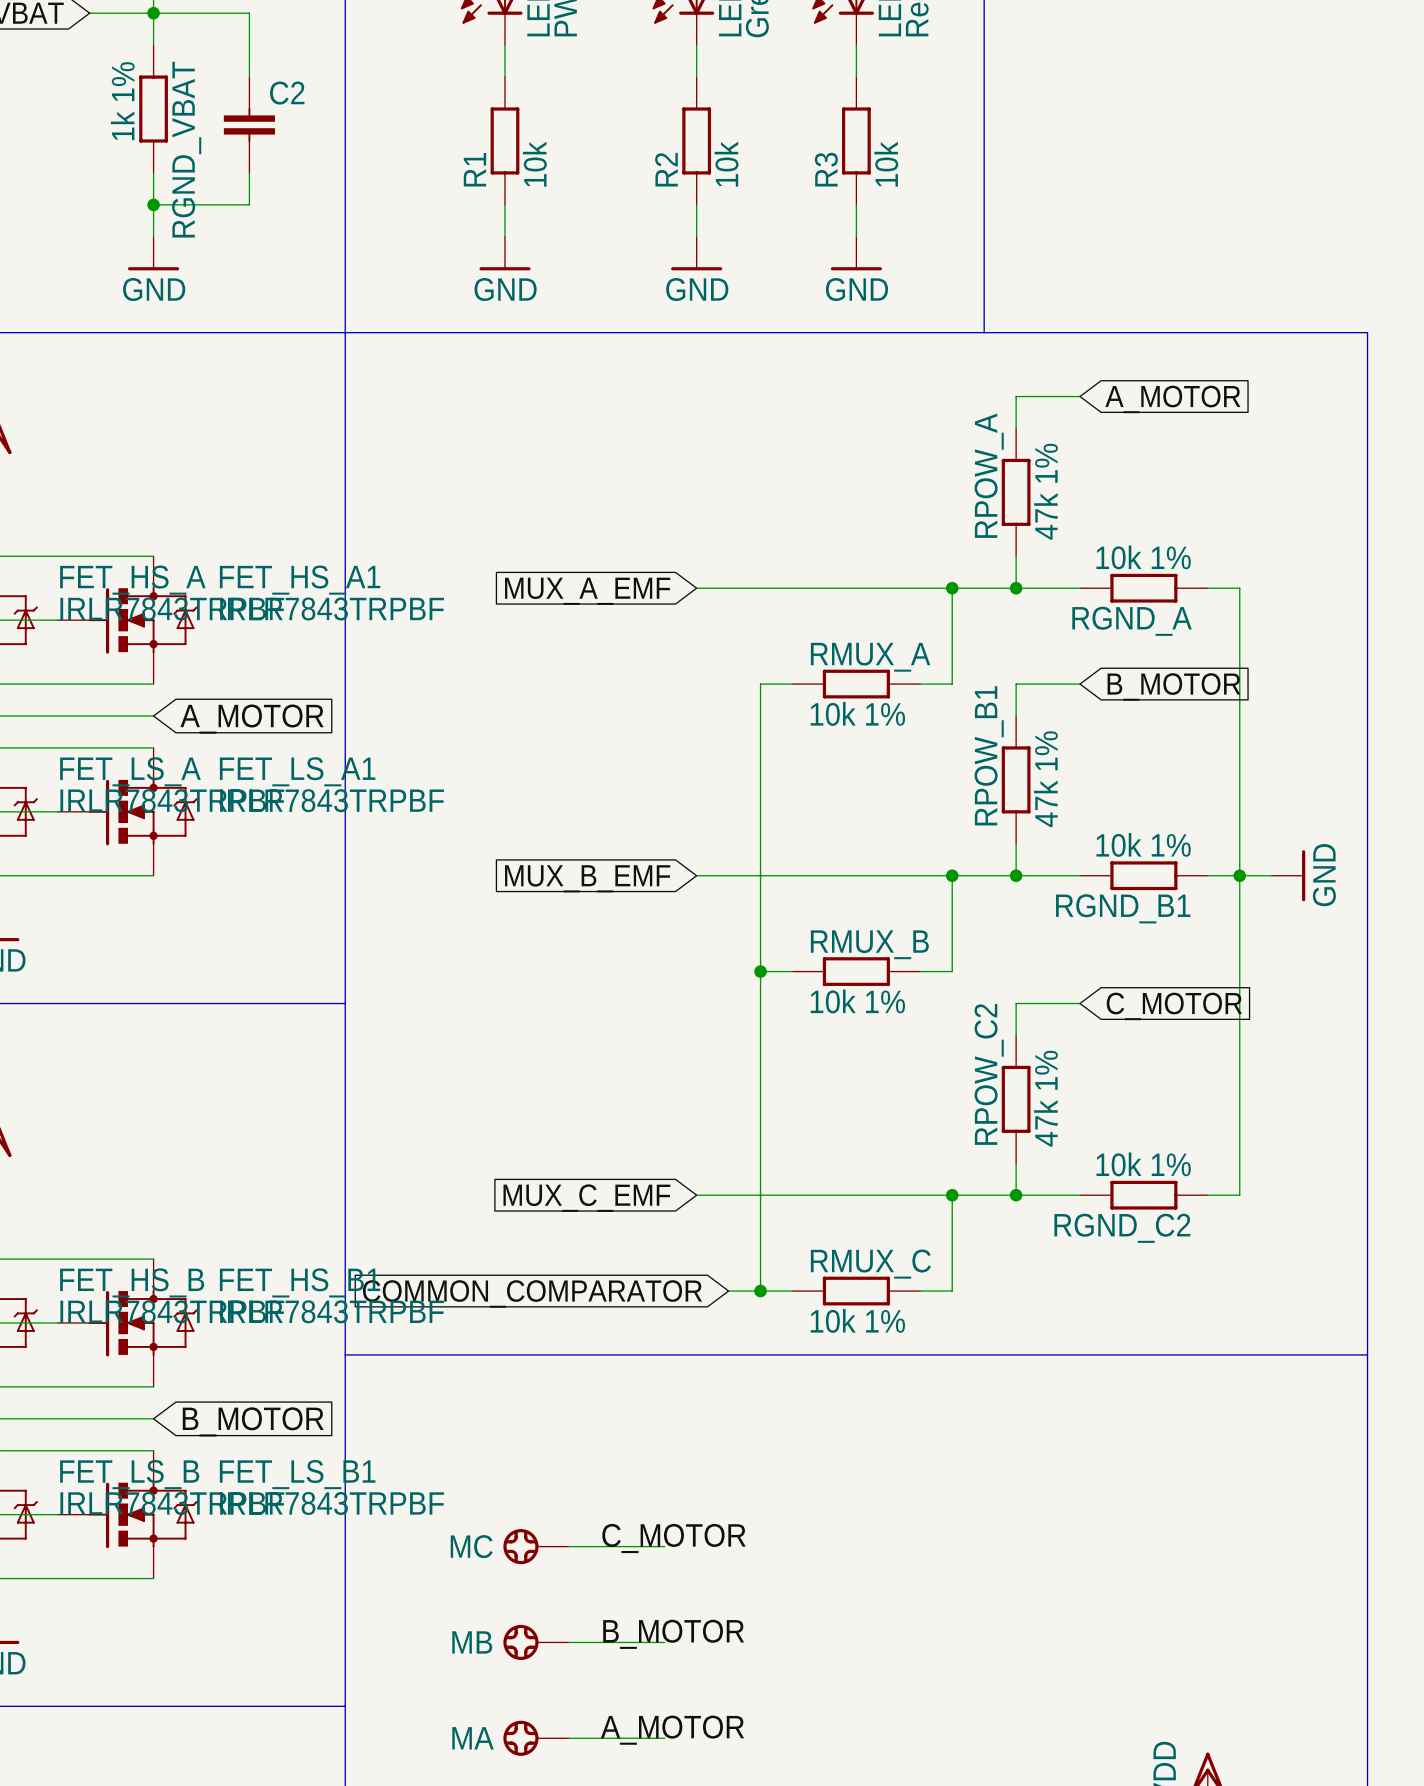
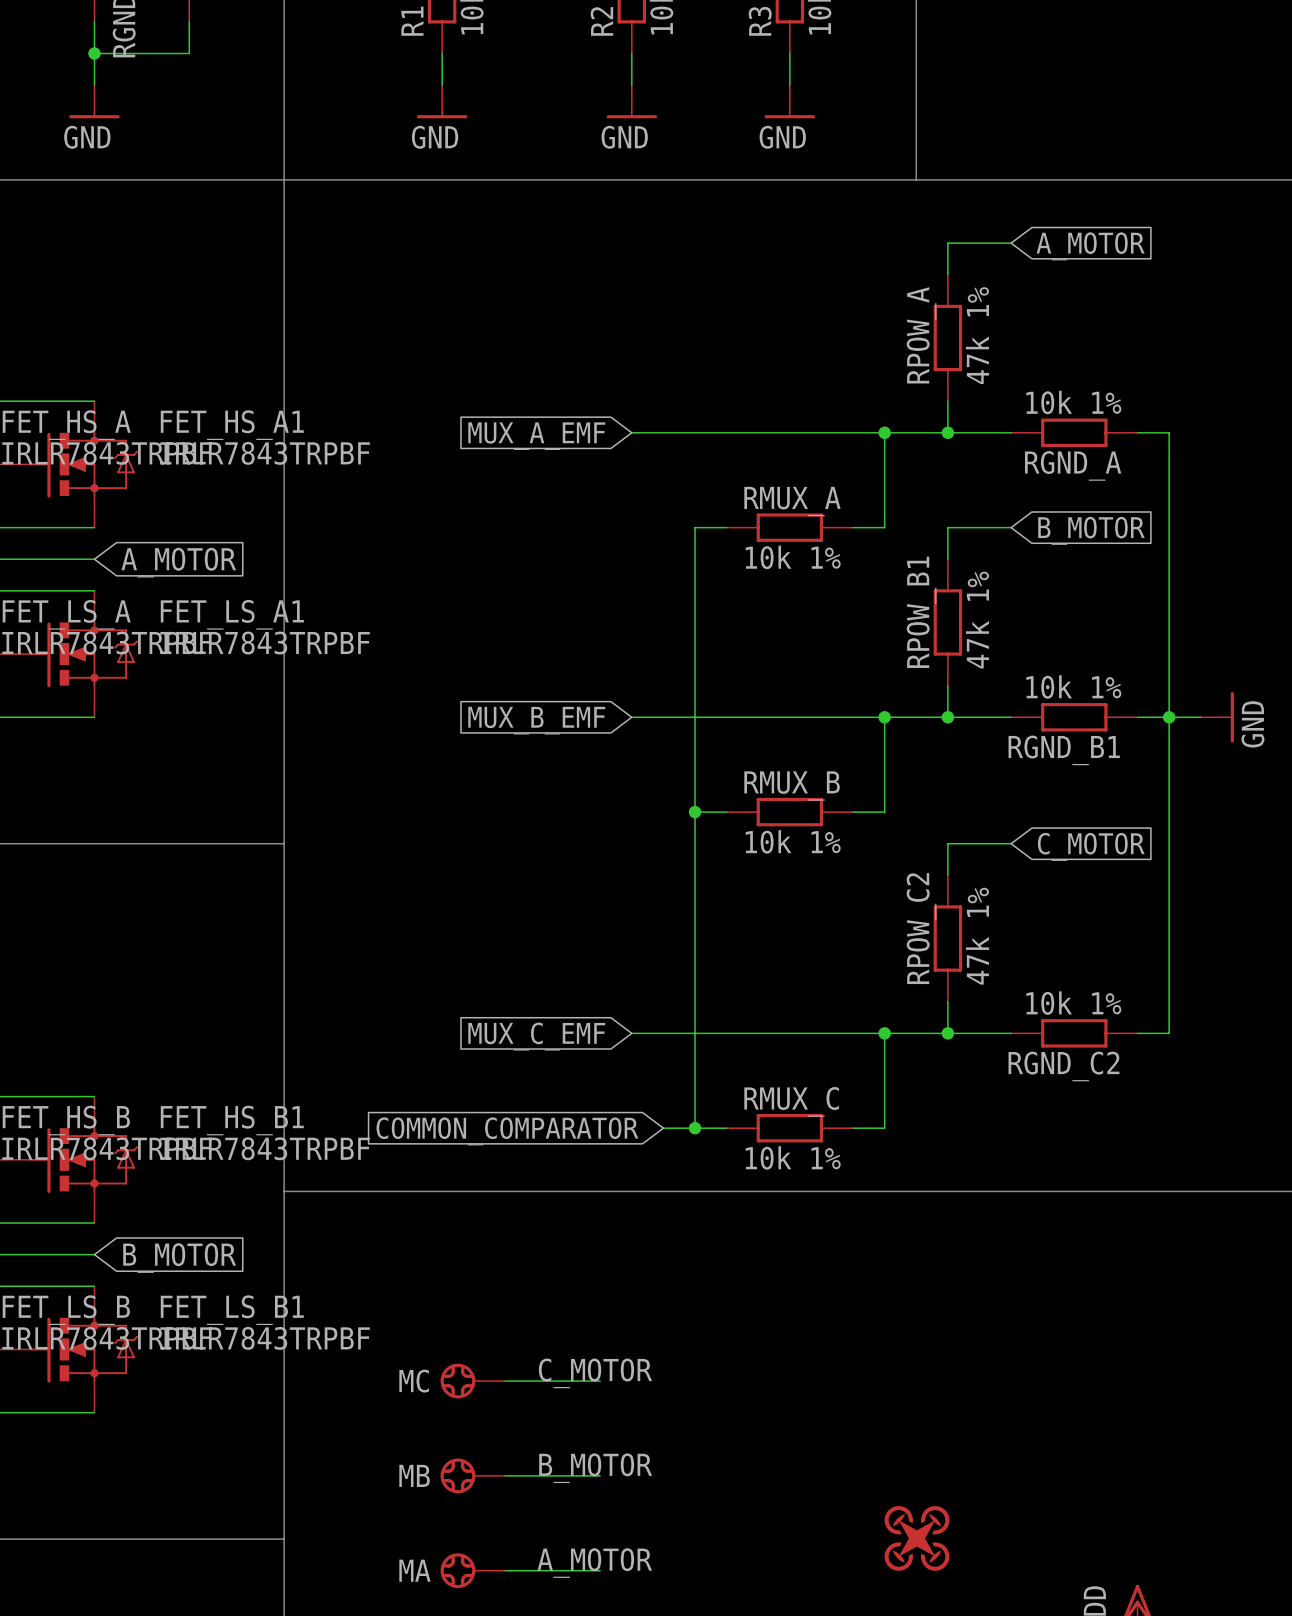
part: none -> (916, 1538)

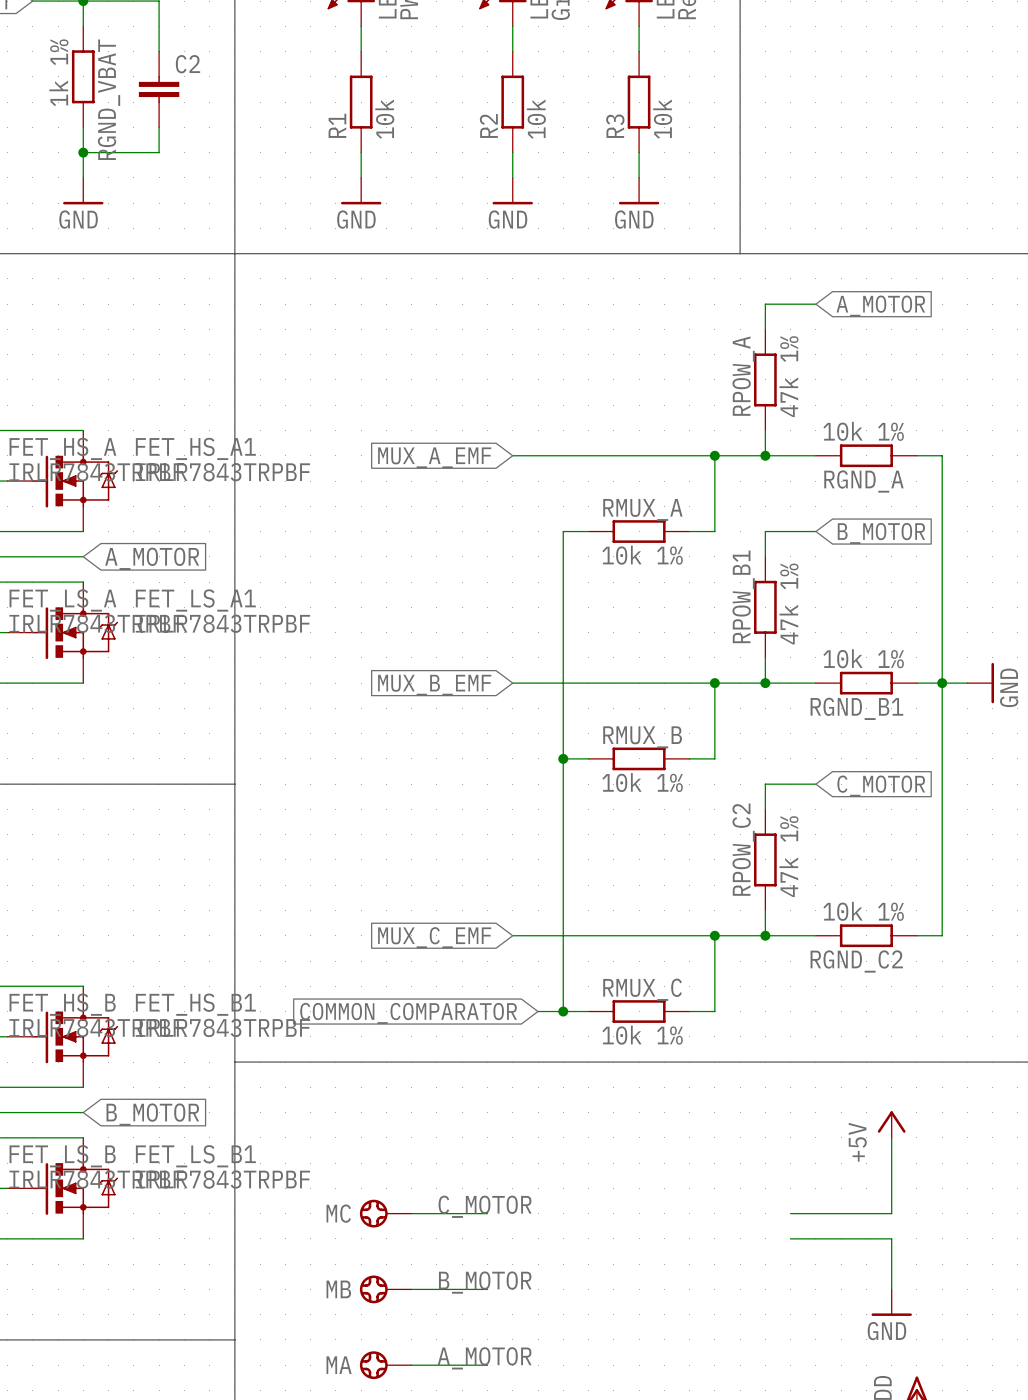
power symbol: none -> +5V (891, 1124)
wire: none -> (891, 1137) (891, 1213) (790, 1213)
wire: none -> (790, 1238) (891, 1238) (891, 1289)
power symbol: none -> GND (891, 1302)
part: (916, 1538) -> none

